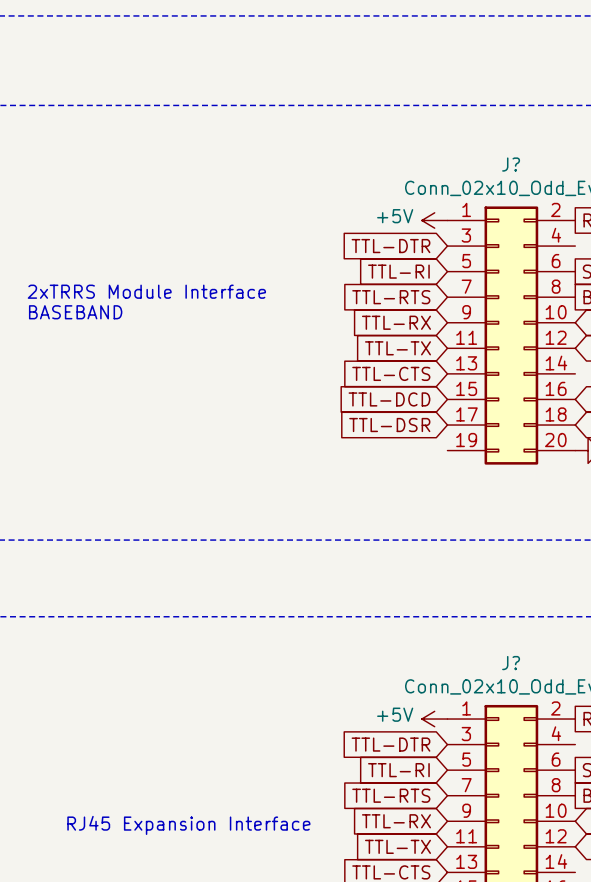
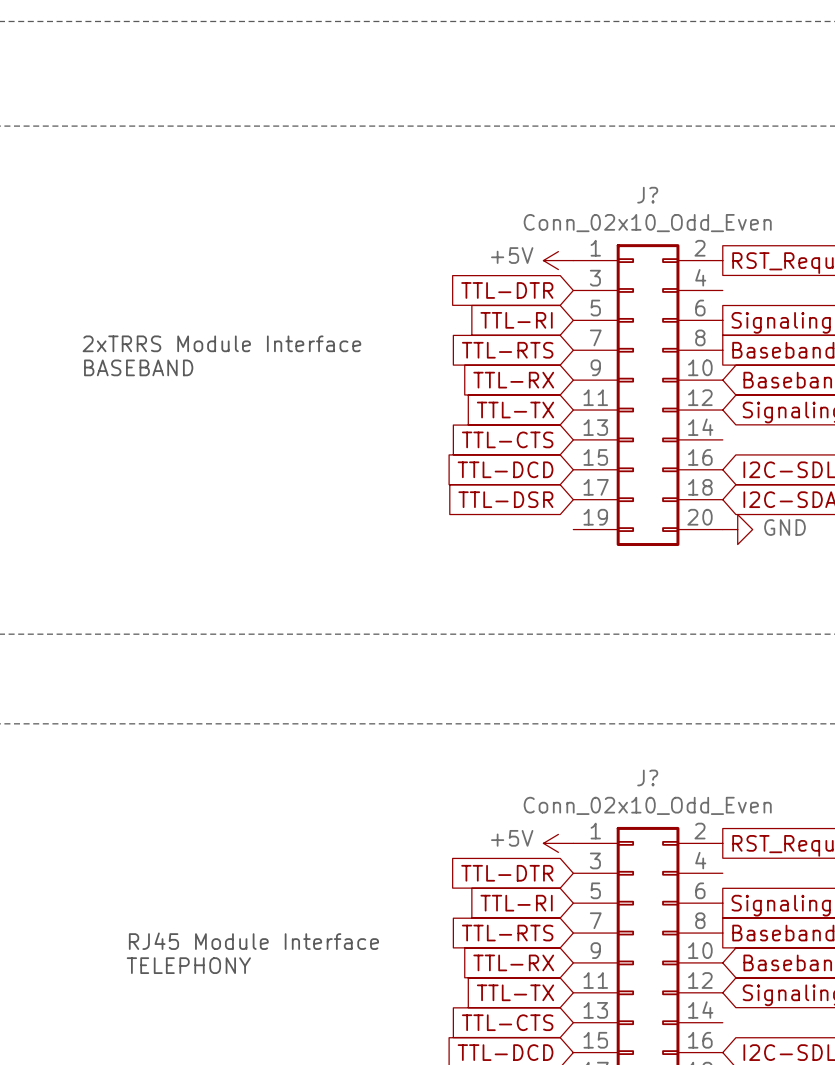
text: none -> RJ45 Module Interface (253, 941)
text: RJ45 Expansion Interface (188, 825) -> TELEPHONY (188, 965)

